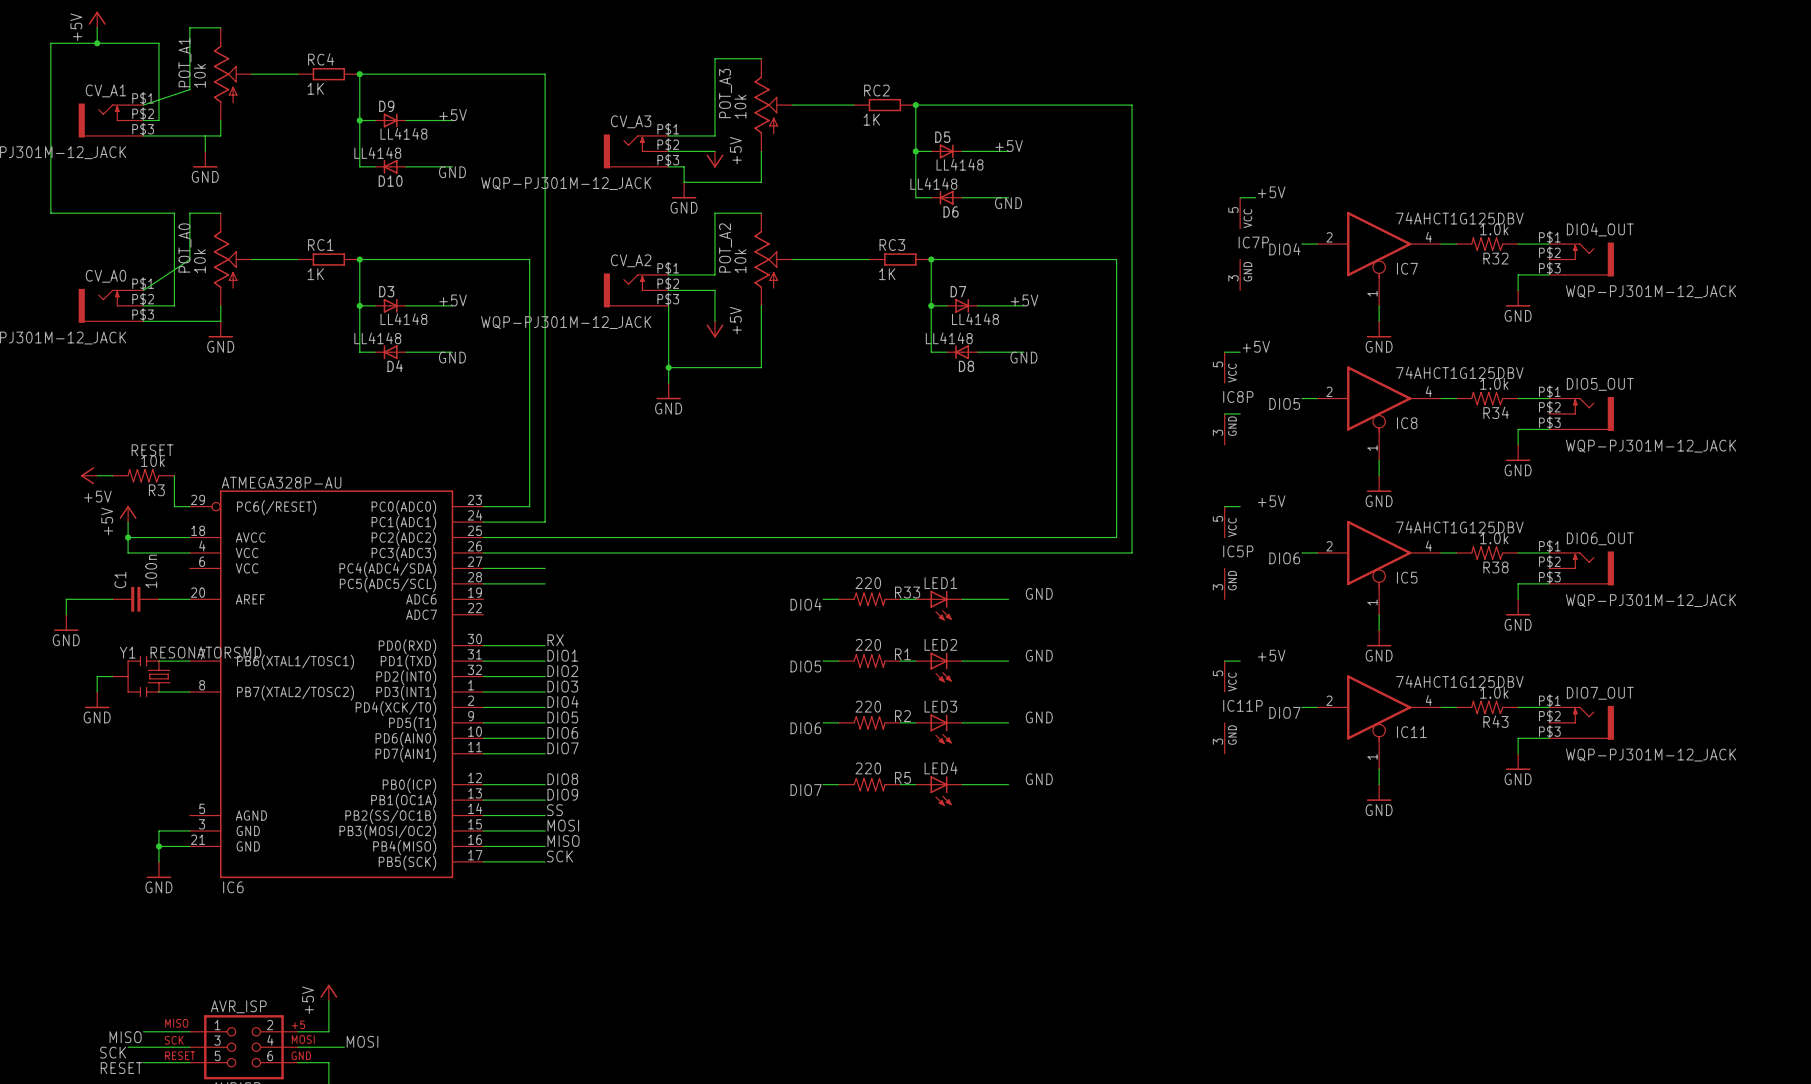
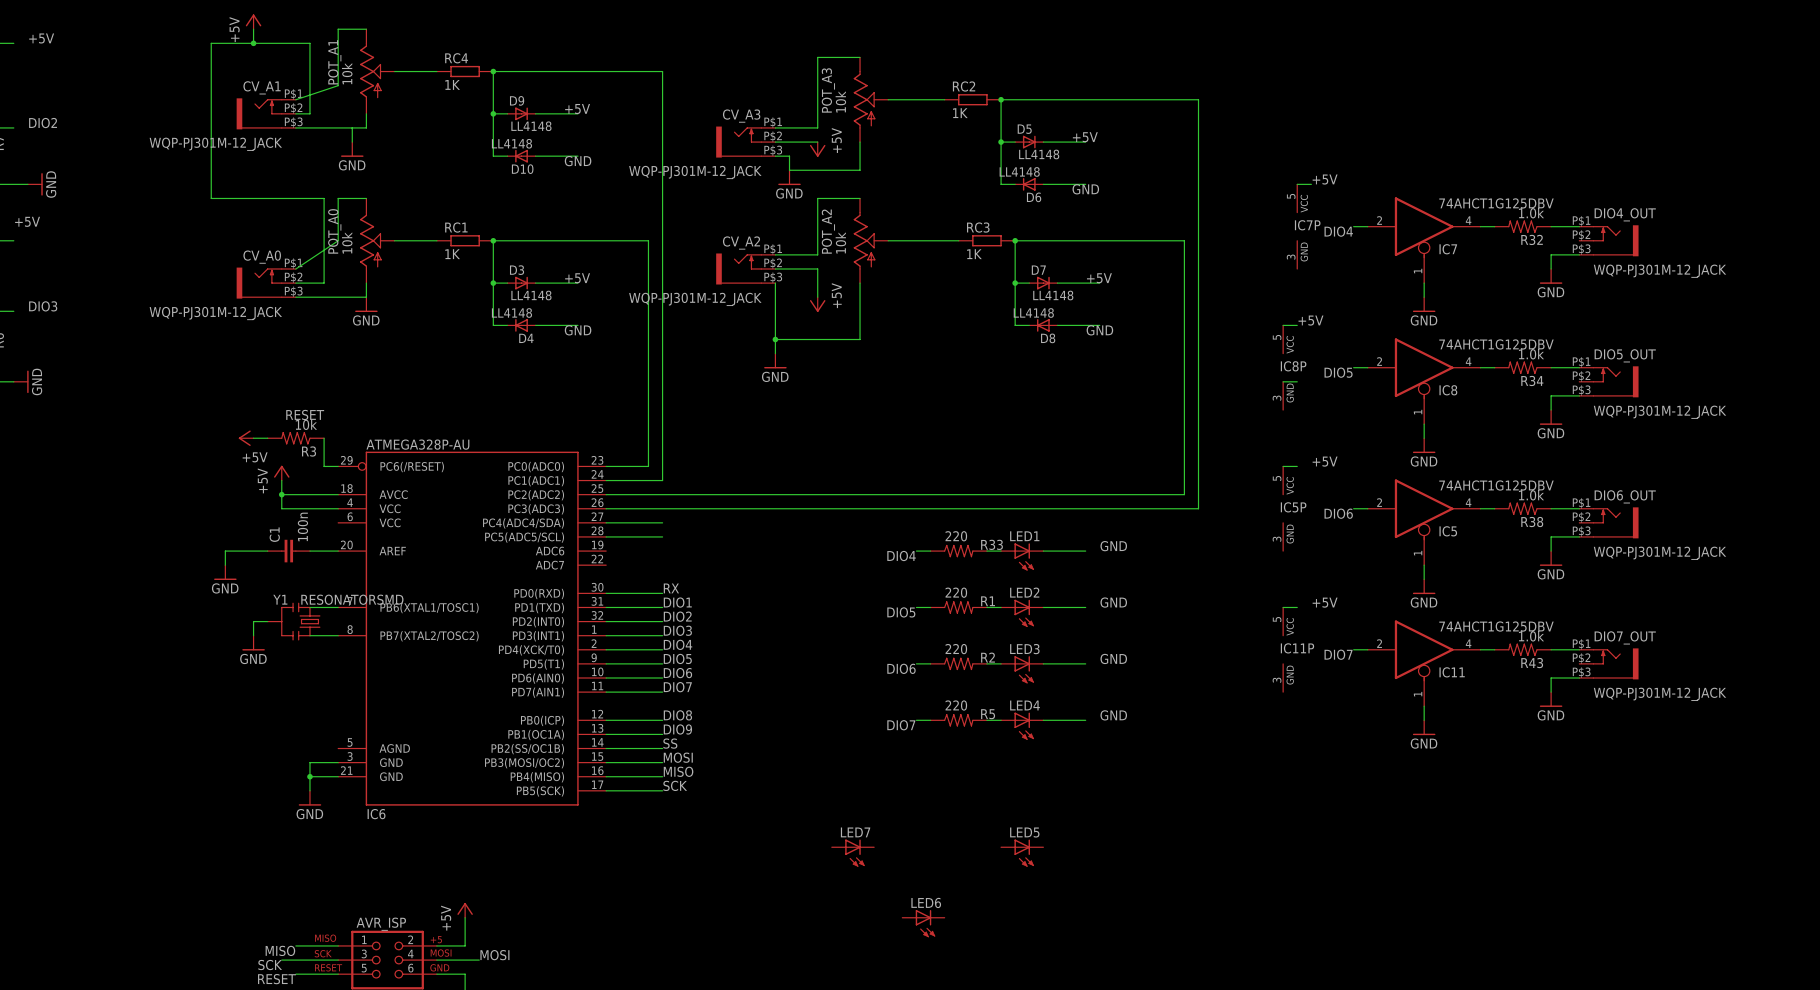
LED7: none -> (852, 853)
LED5: none -> (1022, 853)
LED6: none -> (923, 923)

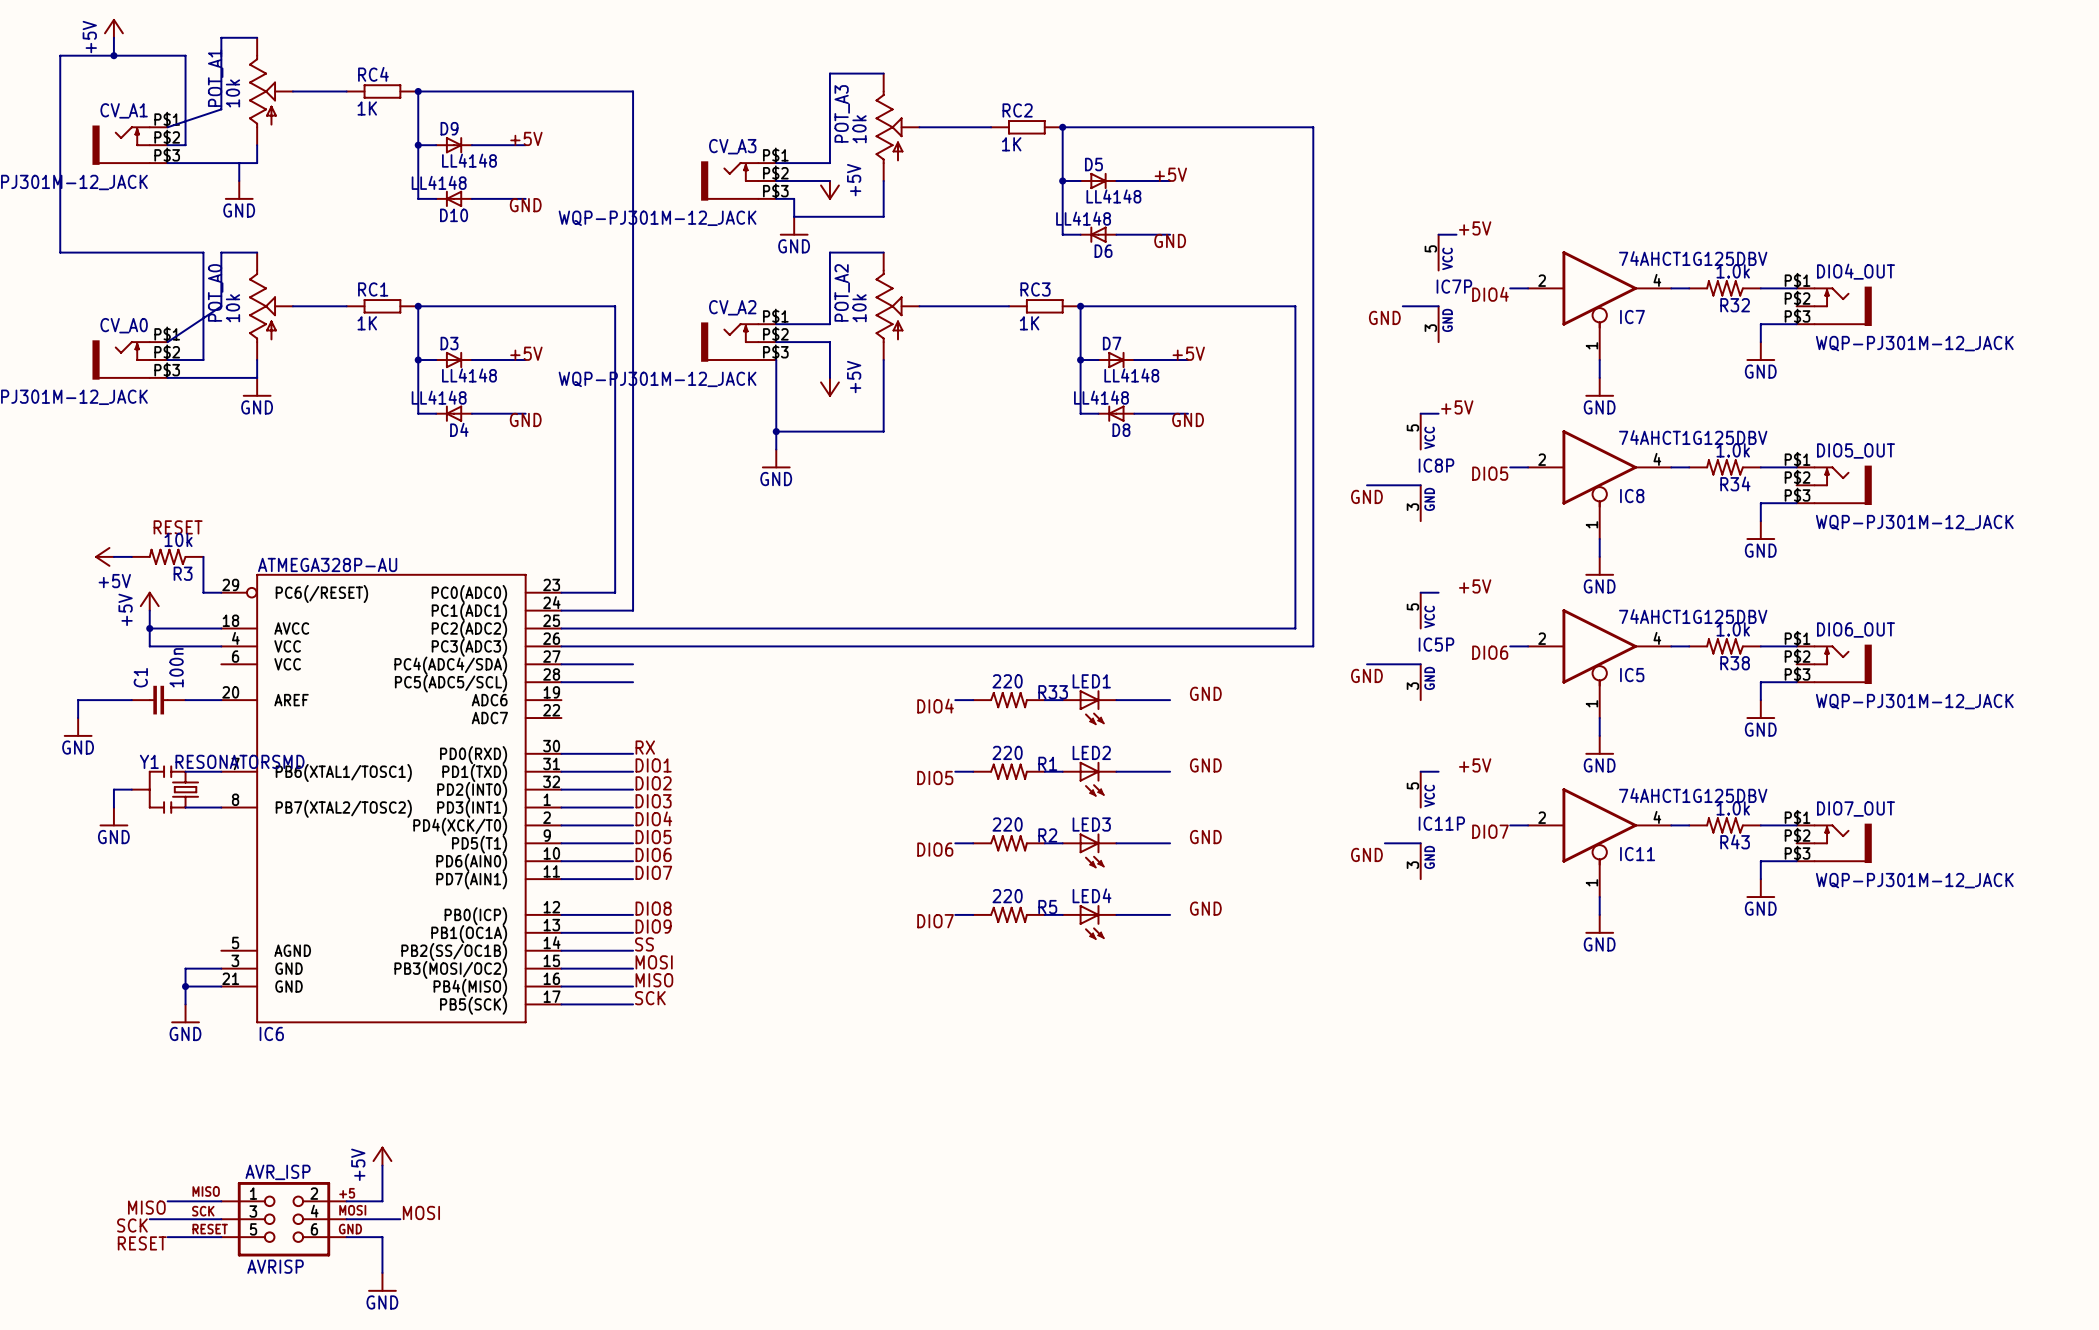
wire: none -> (1402, 306) (1438, 306)
label: none -> GND (1384, 317)
wire: (1283, 381) (1297, 381) -> (1420, 485) (1367, 485)
label: none -> GND (1366, 496)
wire: none -> (1367, 664) (1420, 664)
label: none -> GND (1366, 675)
wire: none -> (1384, 843) (1420, 843)
label: none -> GND (1366, 854)
LED7: (852, 853) -> none
LED5: (1022, 853) -> none
LED6: (923, 923) -> none

